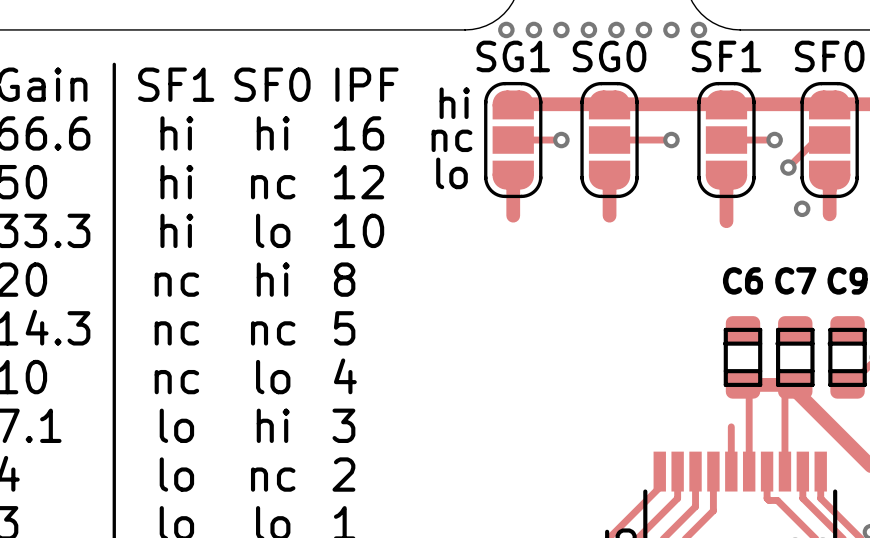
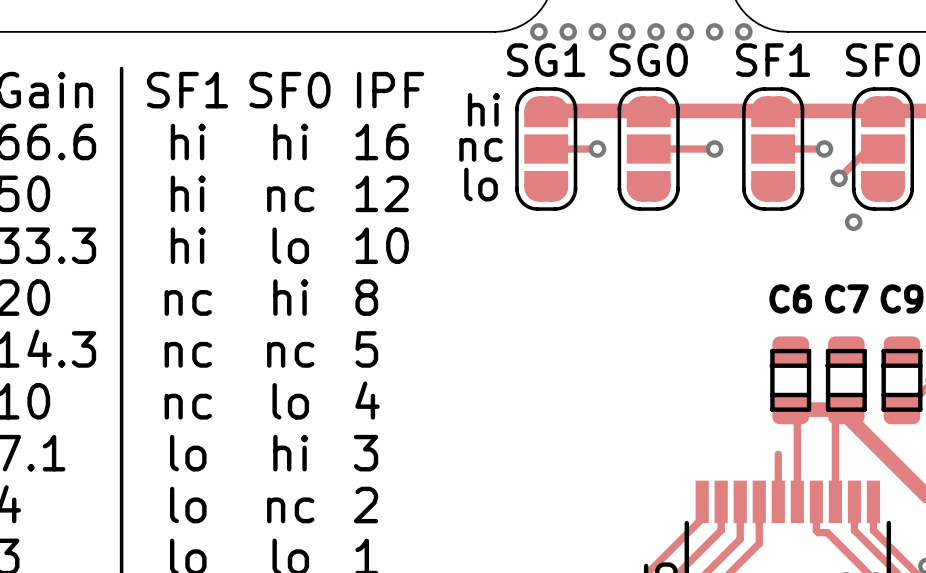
track: (513, 175) (513, 215) -> none
track: (609, 175) (609, 215) -> none
track: (726, 175) (726, 221) -> none
track: (829, 175) (829, 214) -> none

